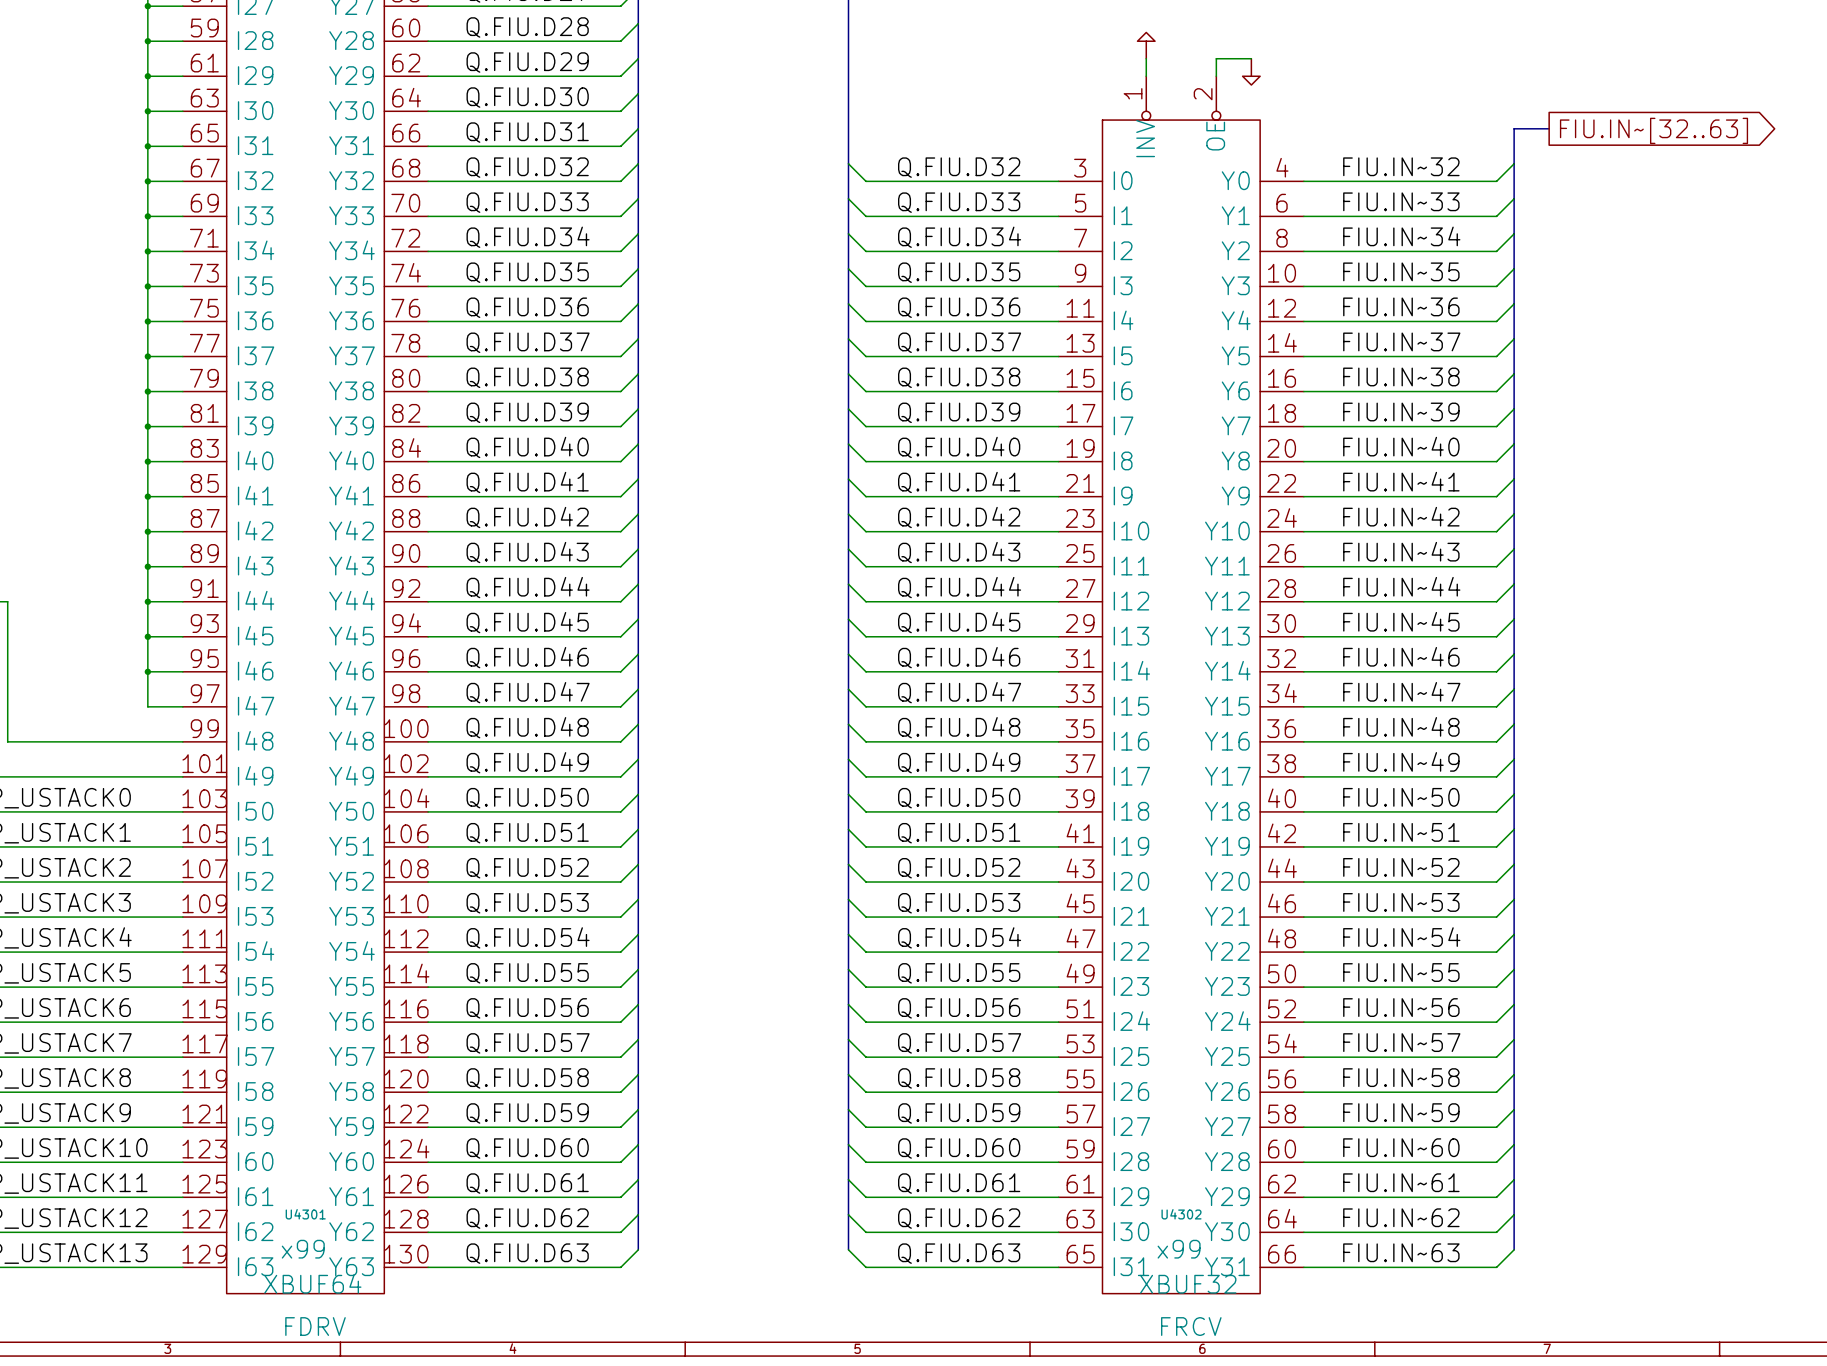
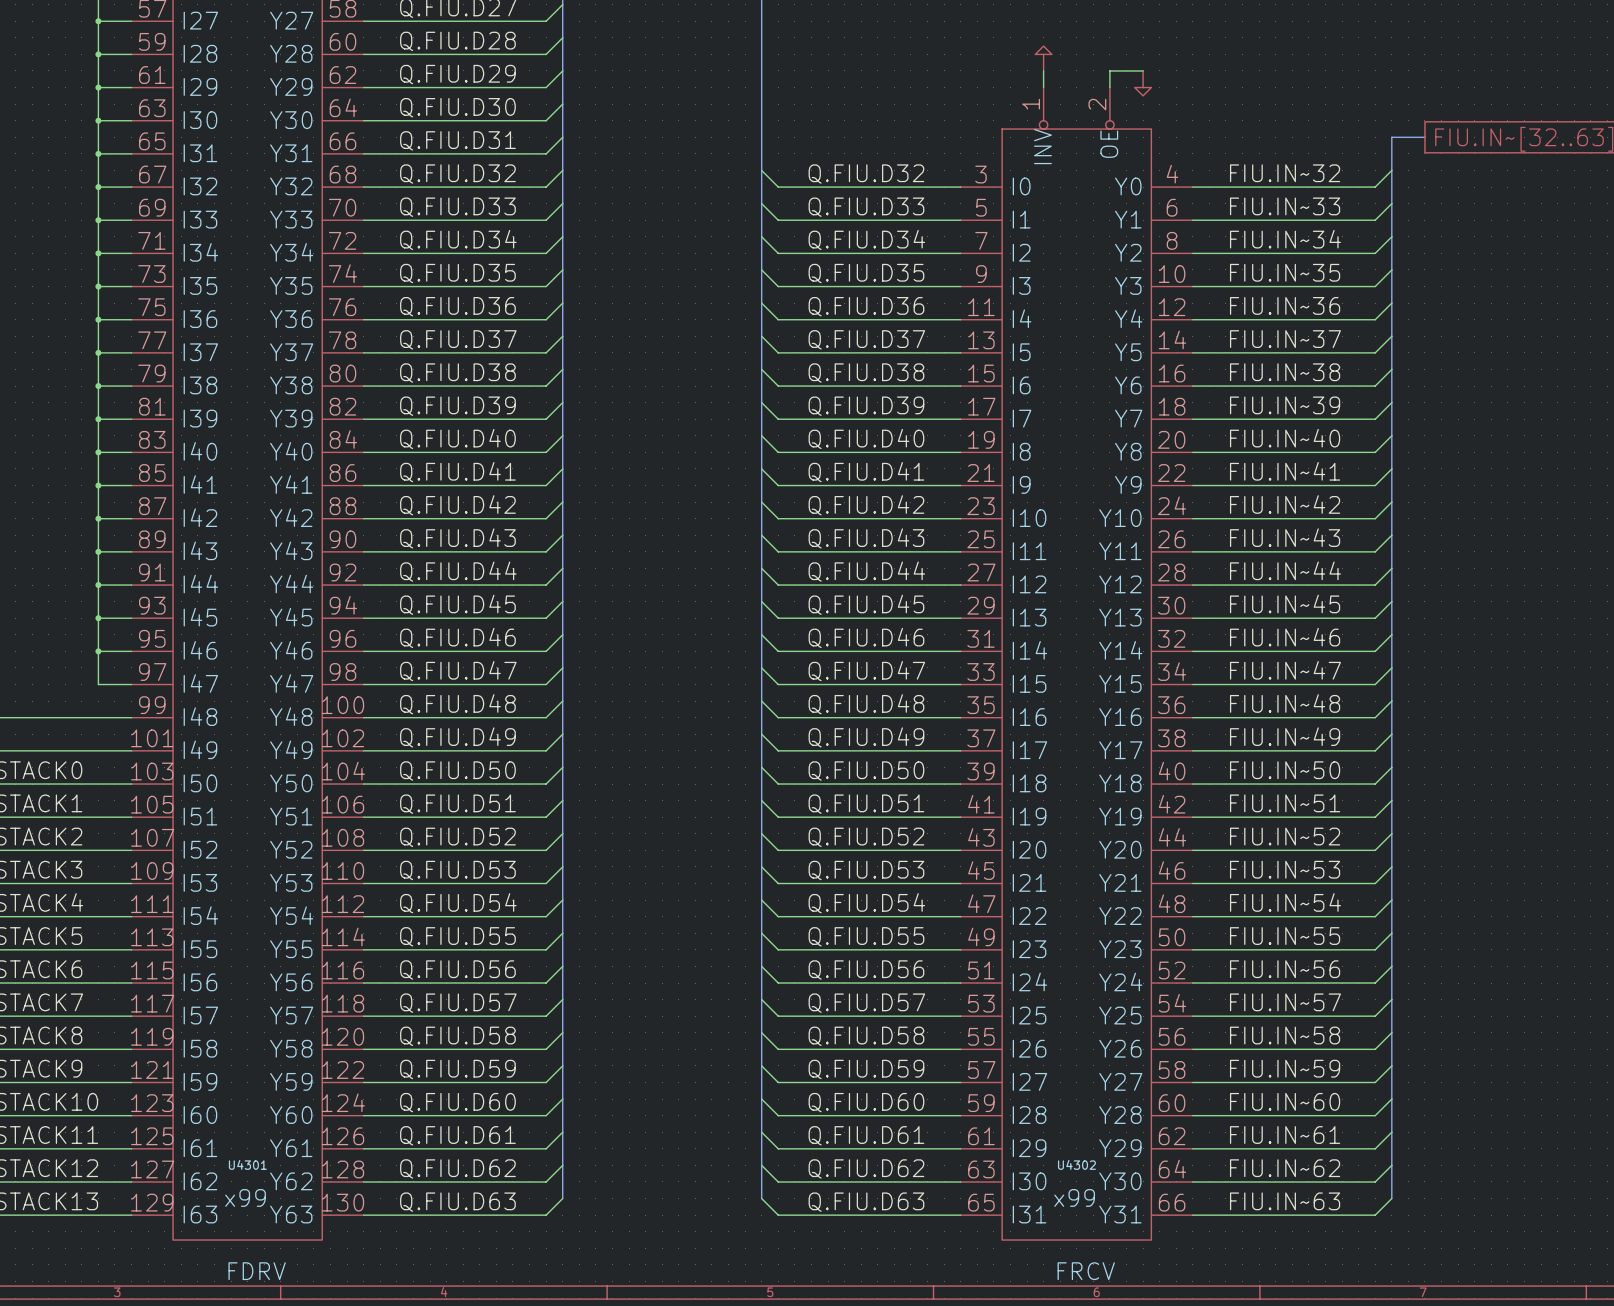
U4301 value: XBUF64 (312, 1283) -> none
U4302 value: XBUF32 (1188, 1284) -> none

